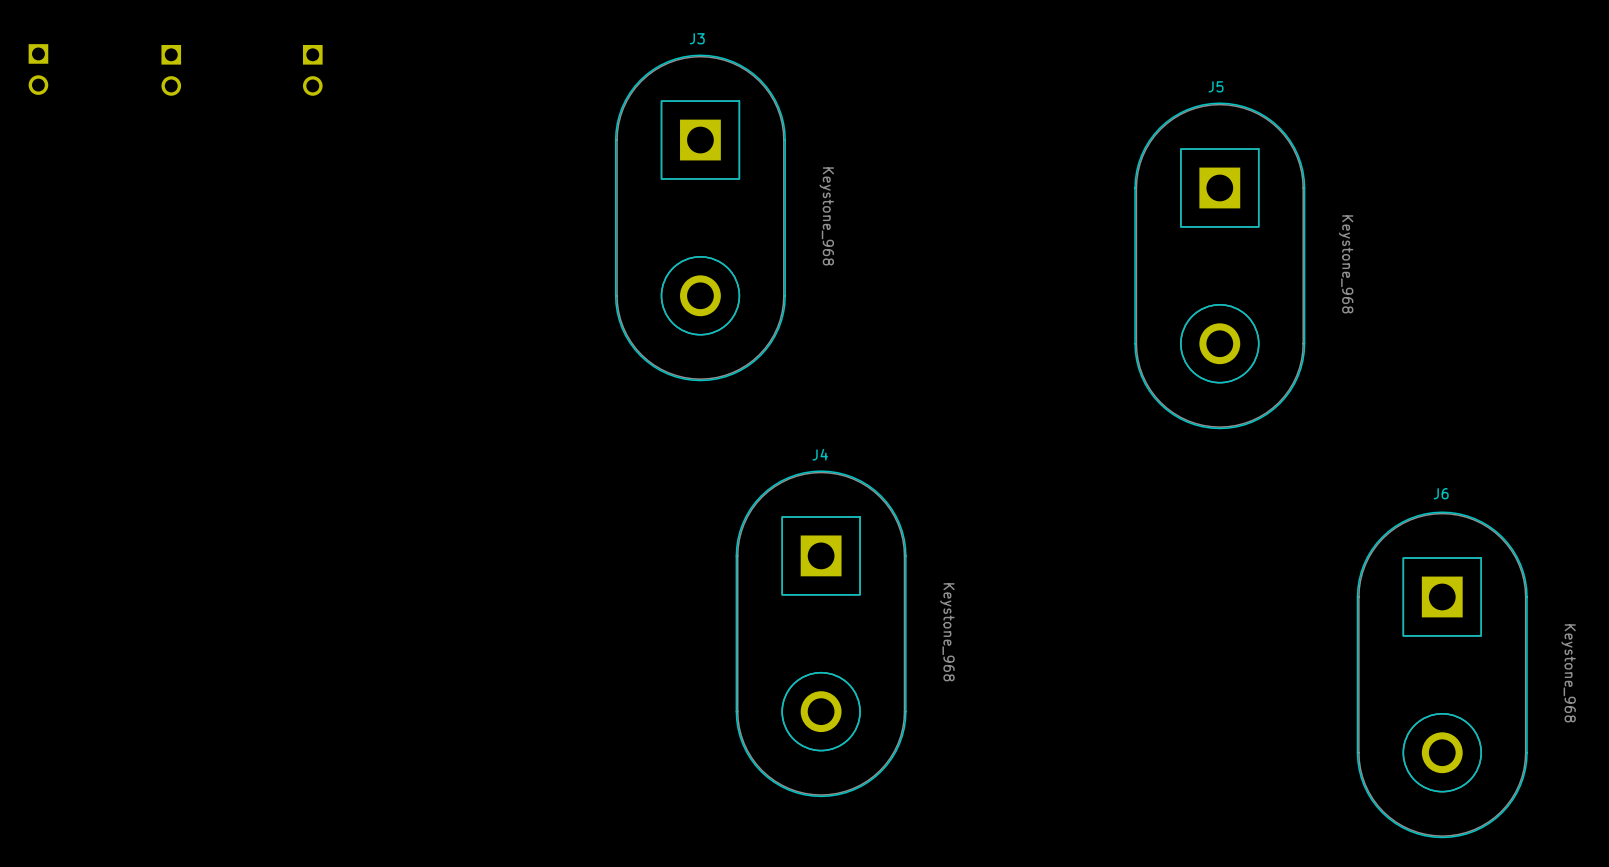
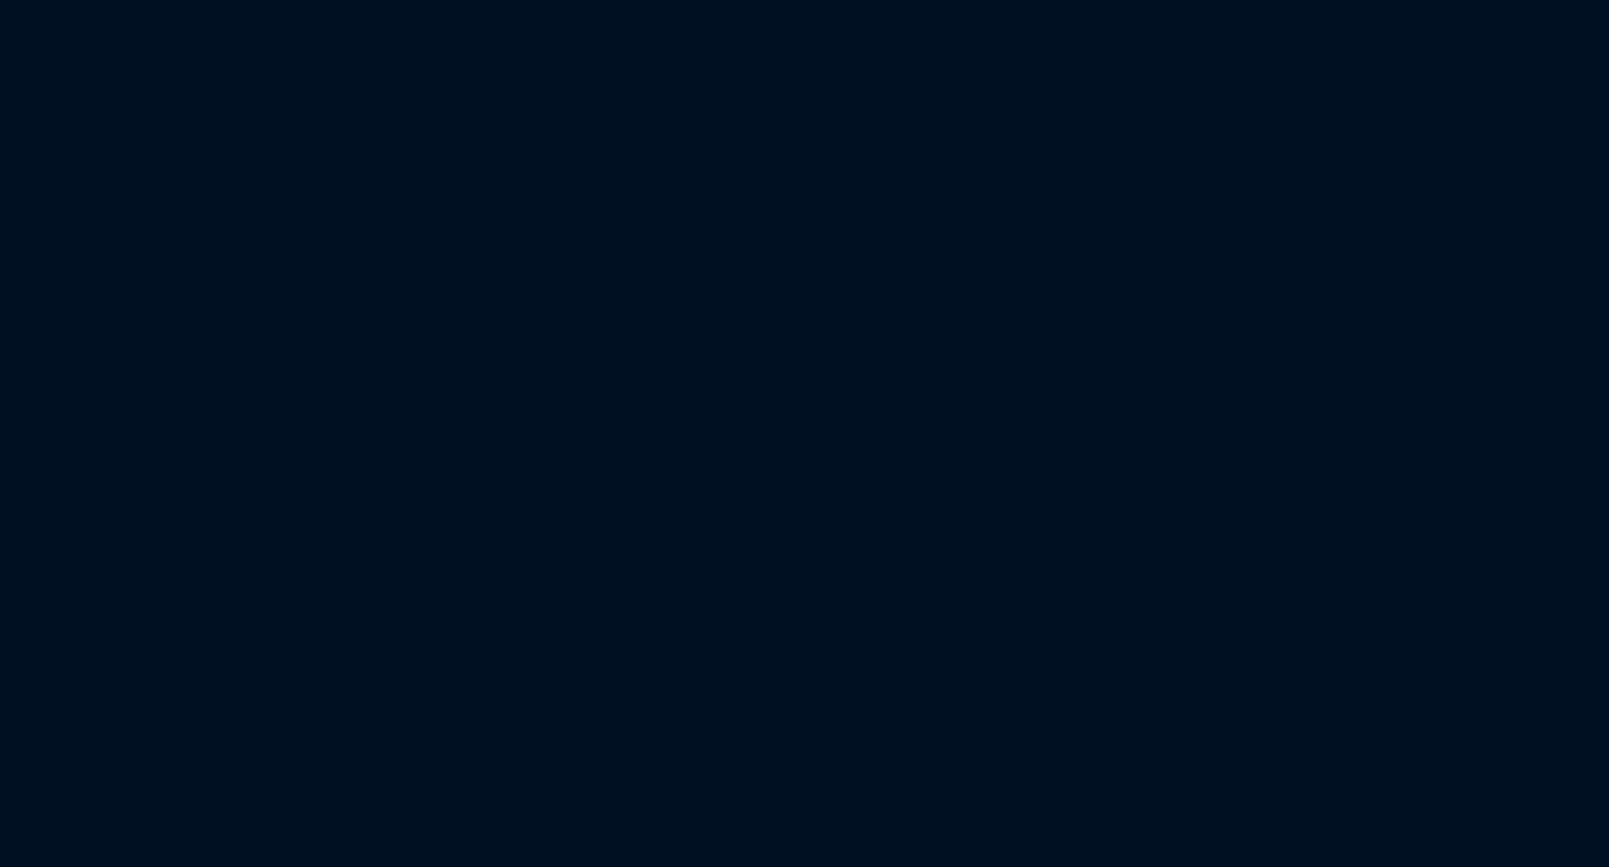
part: (38, 69) -> none
part: (171, 70) -> none
part: (312, 70) -> none
J3: Keystone_968 (700, 217) -> none
J5: Keystone_968 (1219, 265) -> none
J4: Keystone_968 (821, 633) -> none
J6: Keystone_968 (1442, 674) -> none

